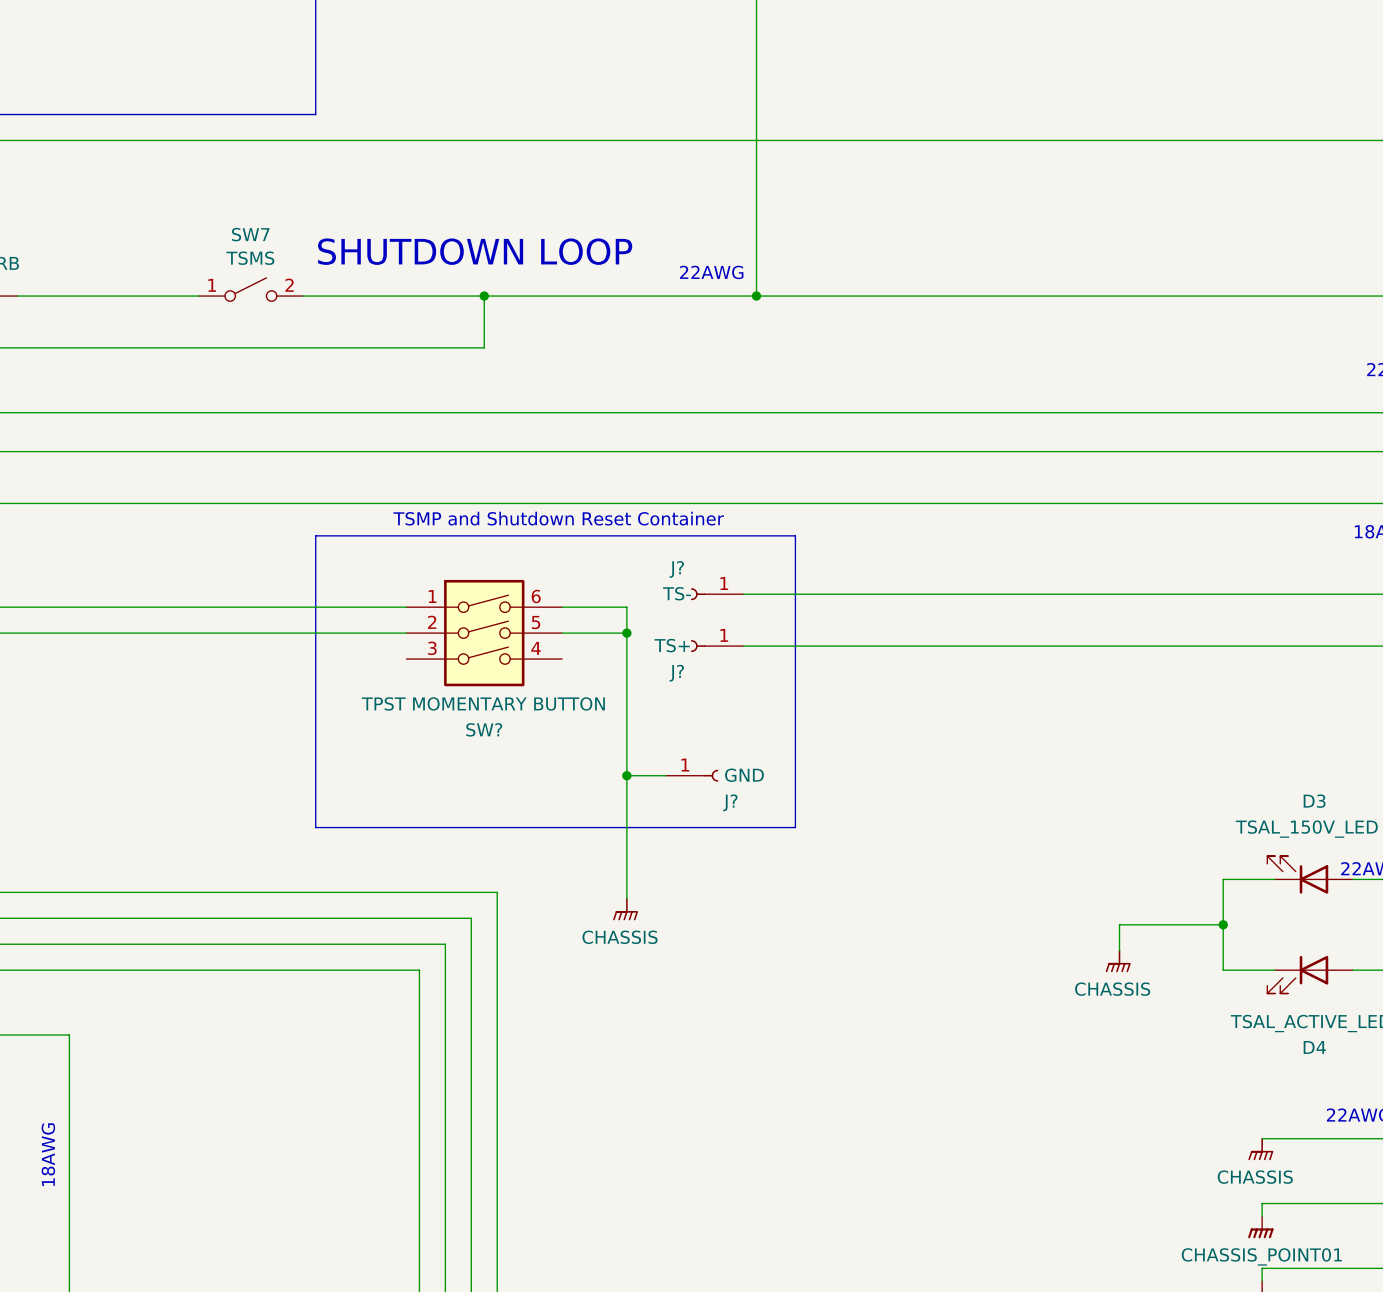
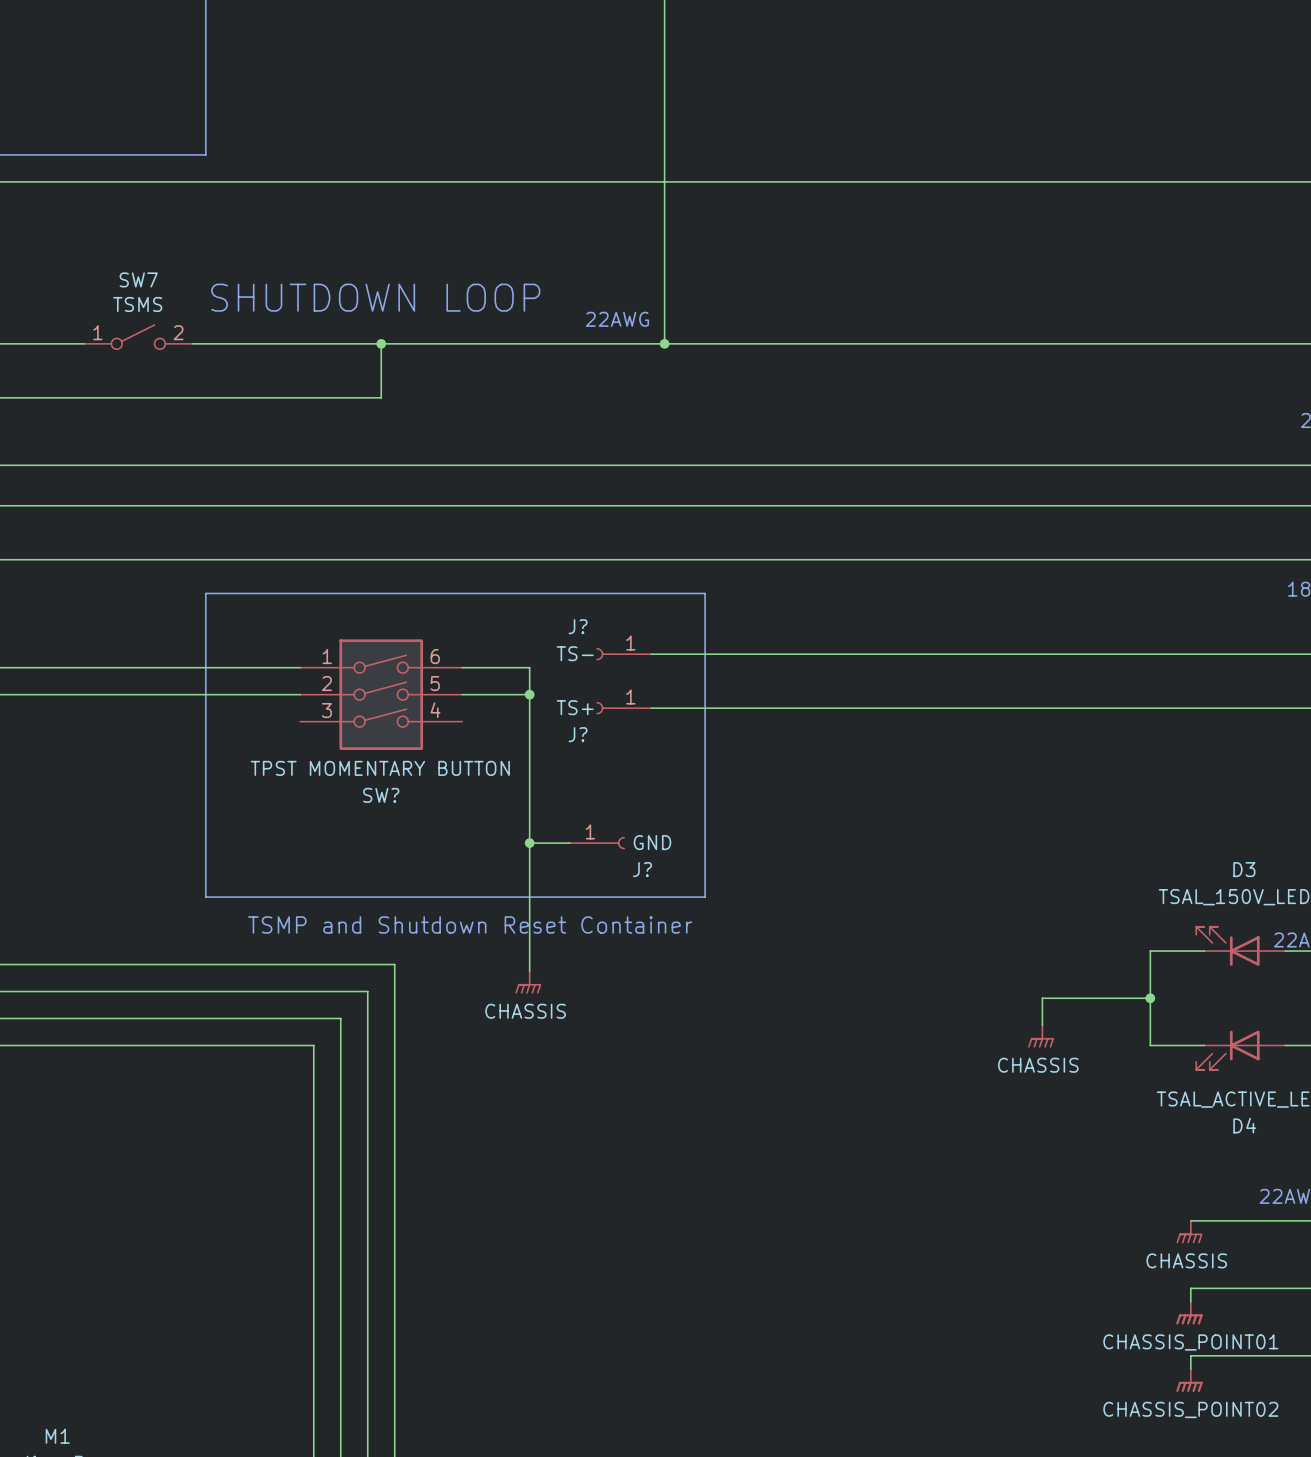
text: TSMP and Shutdown Reset Container (558, 518) -> none
text: none -> TSMP and Shutdown Reset Container (470, 924)

